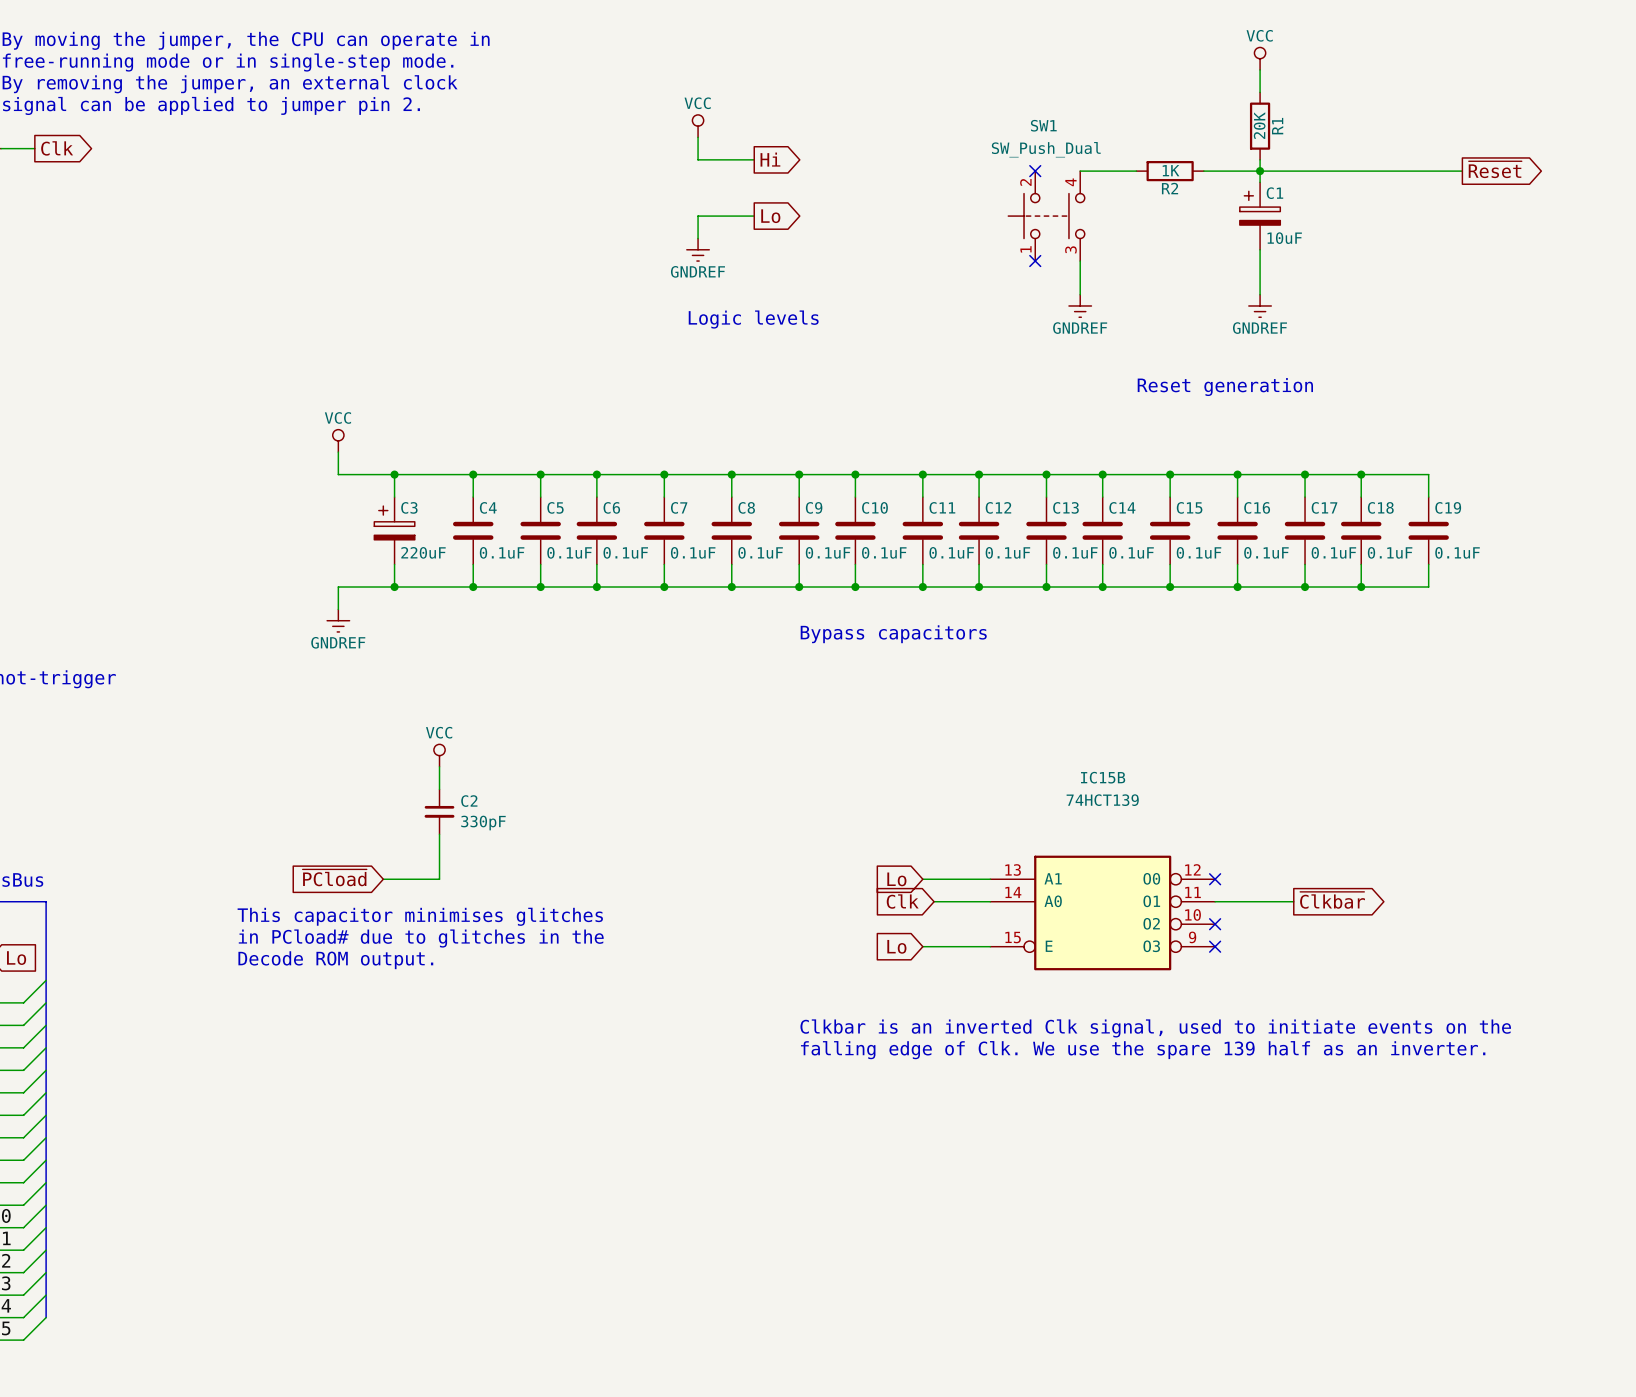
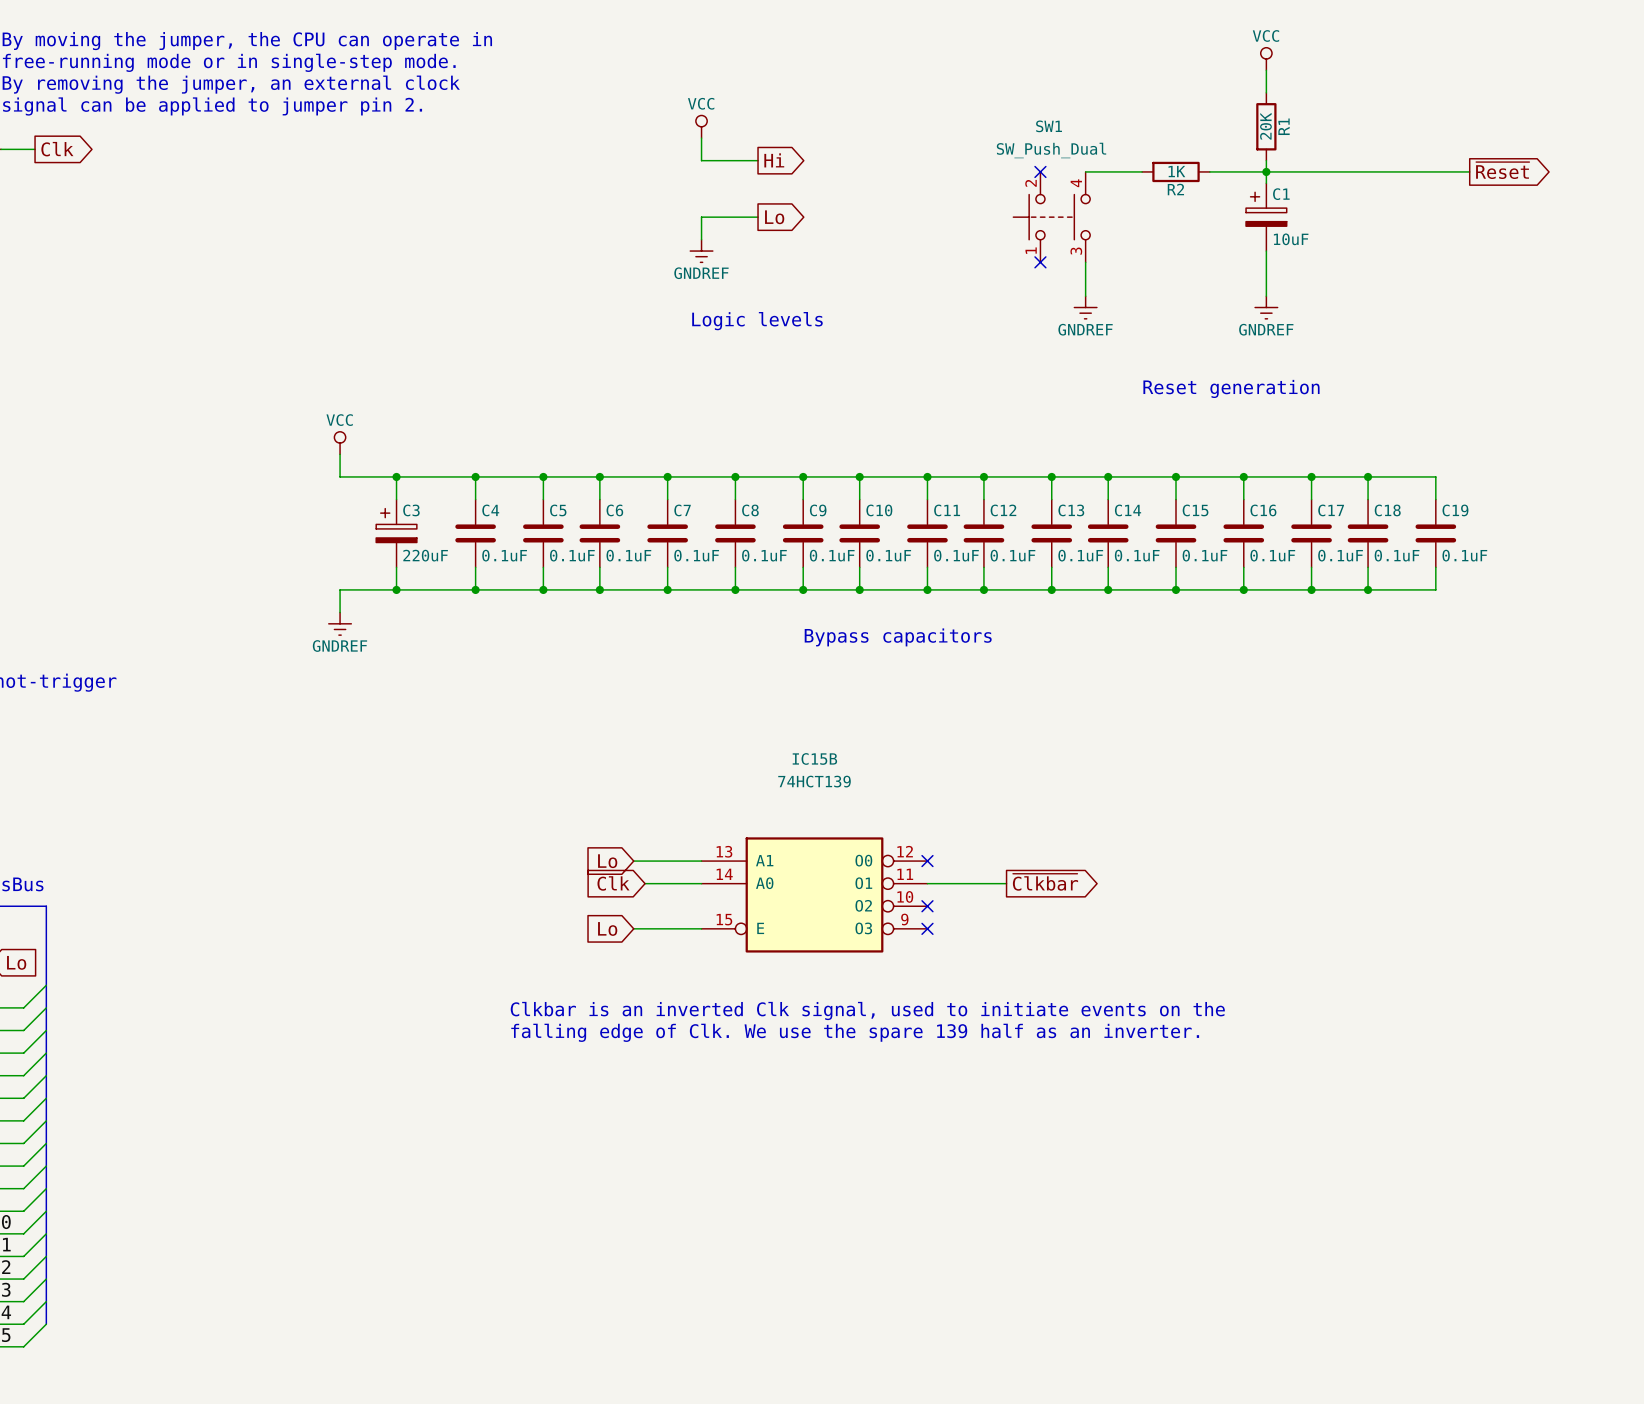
power symbol: VCC (439, 755) -> none
wire: (439, 766) (439, 789) -> none
C2: 330pF (439, 811) -> none
wire: (439, 834) (439, 879) (383, 879) -> none
global label: none -> Lo (607, 861)
wire: none -> (633, 861) (701, 861)
no-connect mark: none -> (927, 861)
global label: ~{PCload} (334, 877) -> none
global label: none -> ~{Clkbar} (1045, 882)
global label: none -> Clk (613, 883)
wire: none -> (645, 883) (701, 883)
global label: Lo (896, 879) -> none
no-connect mark: (1215, 879) -> none
global label: ~{Clkbar} (1332, 900) -> none
global label: Clk (902, 901) -> none
no-connect mark: none -> (927, 906)
wire: (934, 901) (990, 901) -> none
wire: (1215, 901) (1293, 901) -> none
IC15B position: (1102, 912) -> (814, 894)
text: This capacitor minimises glitches (420, 916) -> none
global label: none -> Lo (607, 928)
wire: none -> (633, 928) (701, 928)
no-connect mark: none -> (927, 928)
no-connect mark: (1215, 924) -> none
text: in PCload# due to glitches in the (421, 938) -> none
global label: Lo (896, 946) -> none
wire: (922, 946) (990, 946) -> none
no-connect mark: (1215, 946) -> none
text: Decode ROM output. (335, 960) -> none
text: none -> Clkbar is an inverted Clk signal, used to initiate events on the (867, 1010)
text: none -> falling edge of Clk. We use the spare 139 half as an inverter. (855, 1032)
text: Clkbar is an inverted Clk signal, used to initiate events on the (1155, 1028) -> none
text: falling edge of Clk. We use the spare 139 half as an inverter. (1143, 1050) -> none

